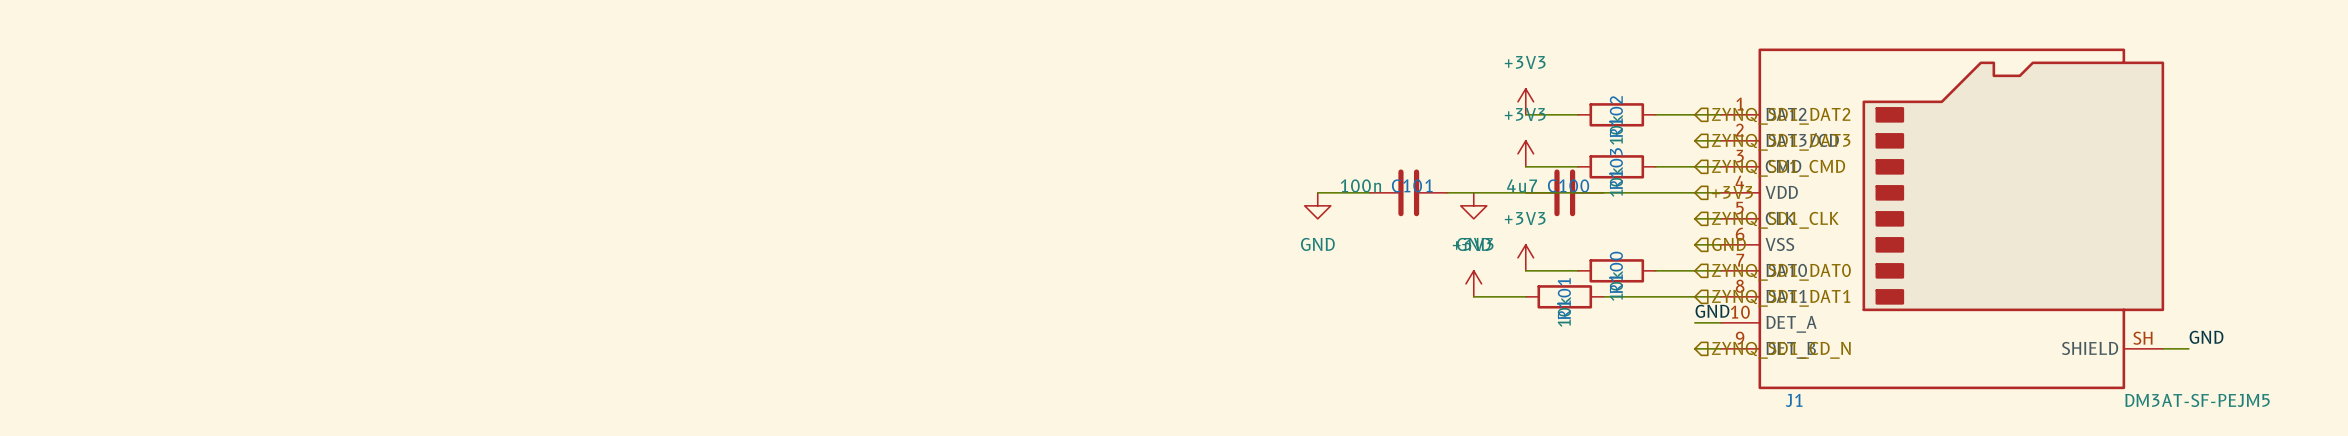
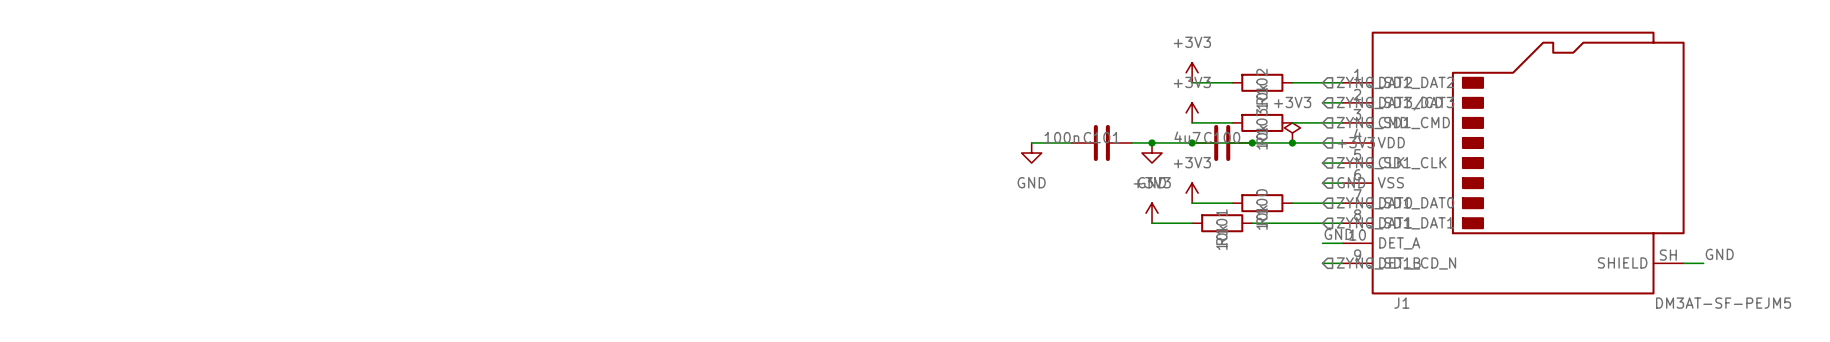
power symbol: none -> +3V3 (1292, 132)
junction: none -> (1152, 142)
junction: none -> (1192, 142)
junction: none -> (1252, 142)
junction: none -> (1292, 142)

